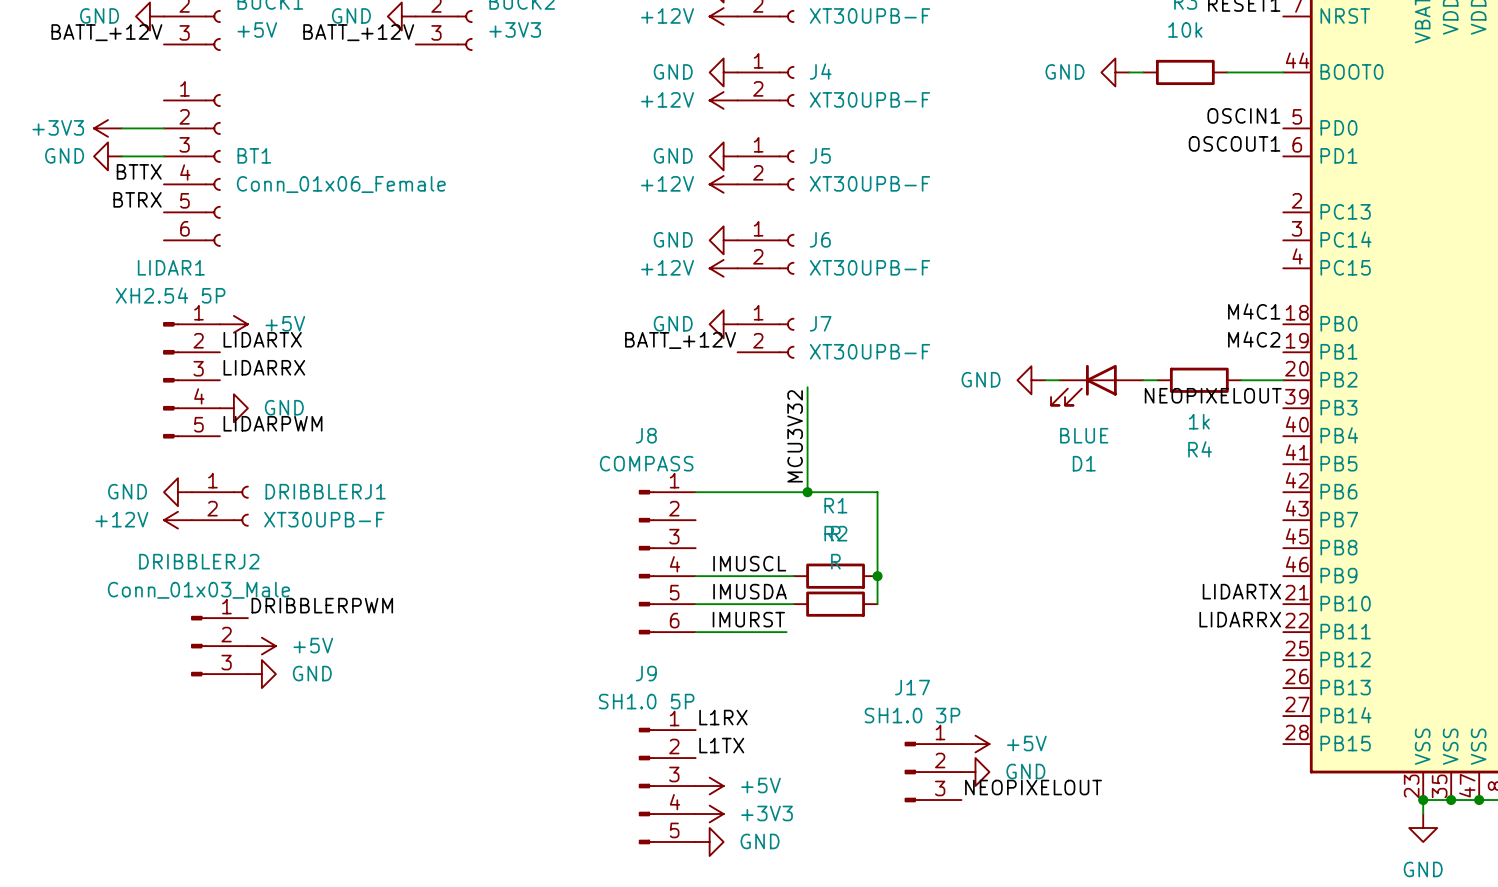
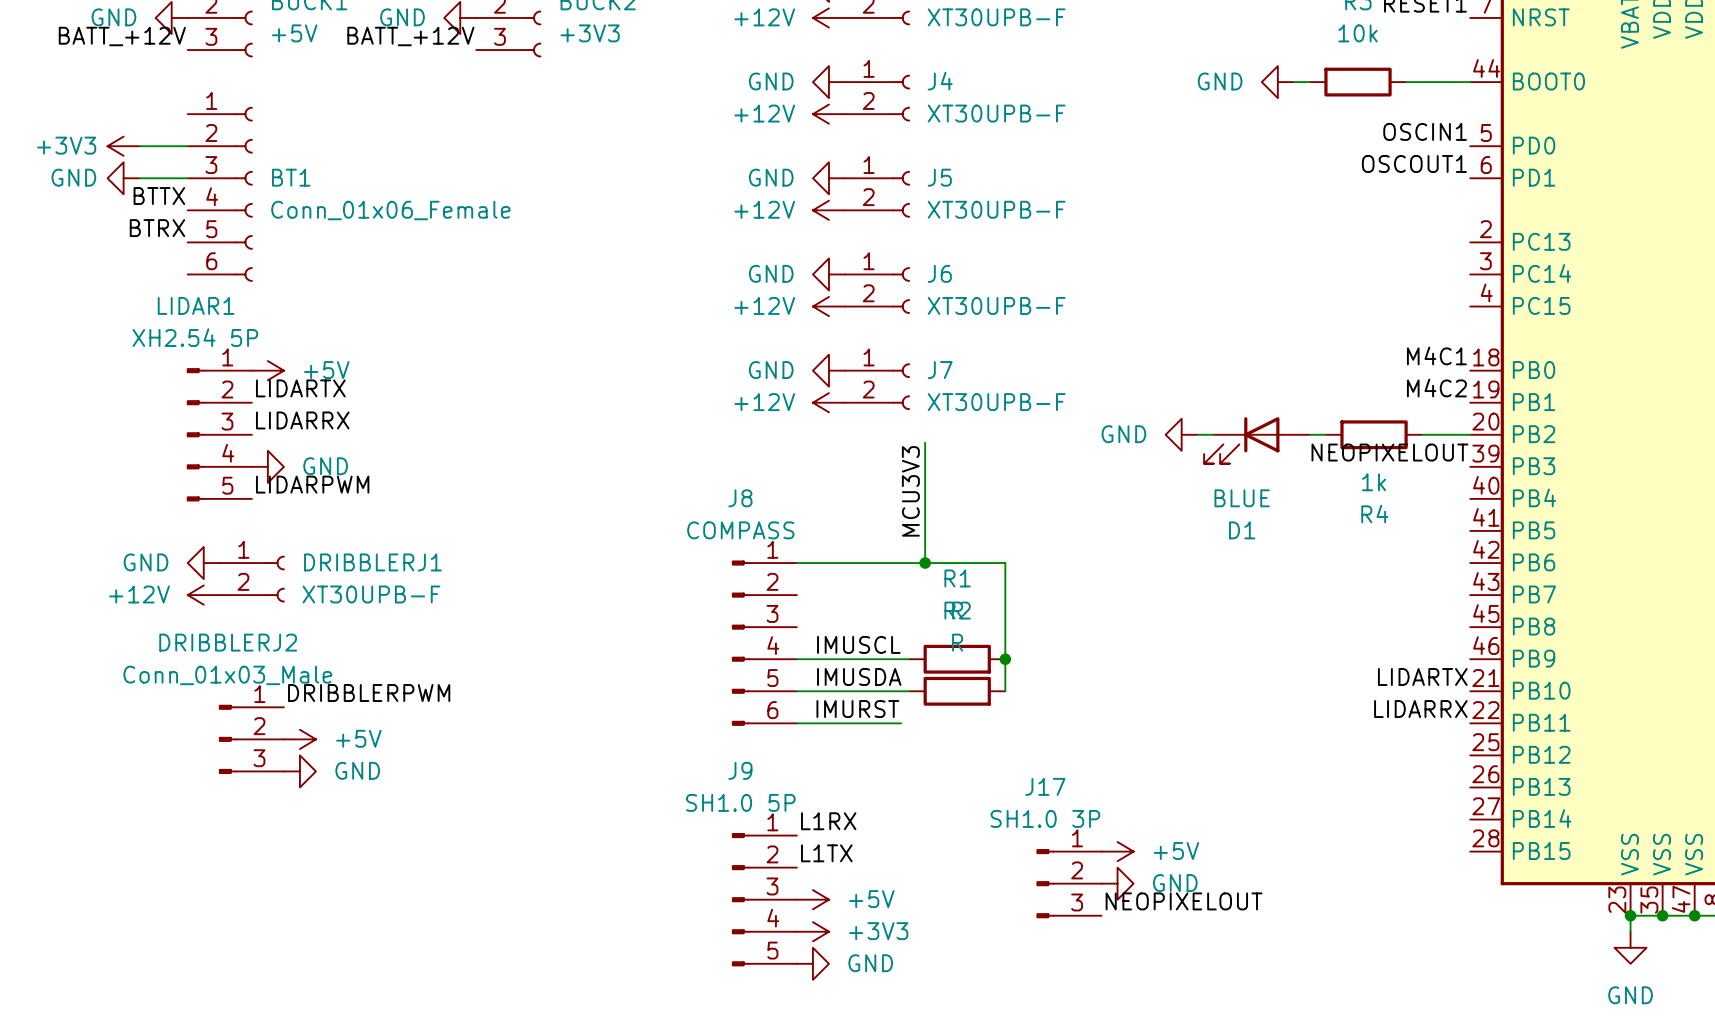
label: BATT_+12V (680, 340) -> none
power symbol: none -> +12V (828, 402)
label: MCU3V32 (795, 436) -> MCU3V3 (910, 491)

